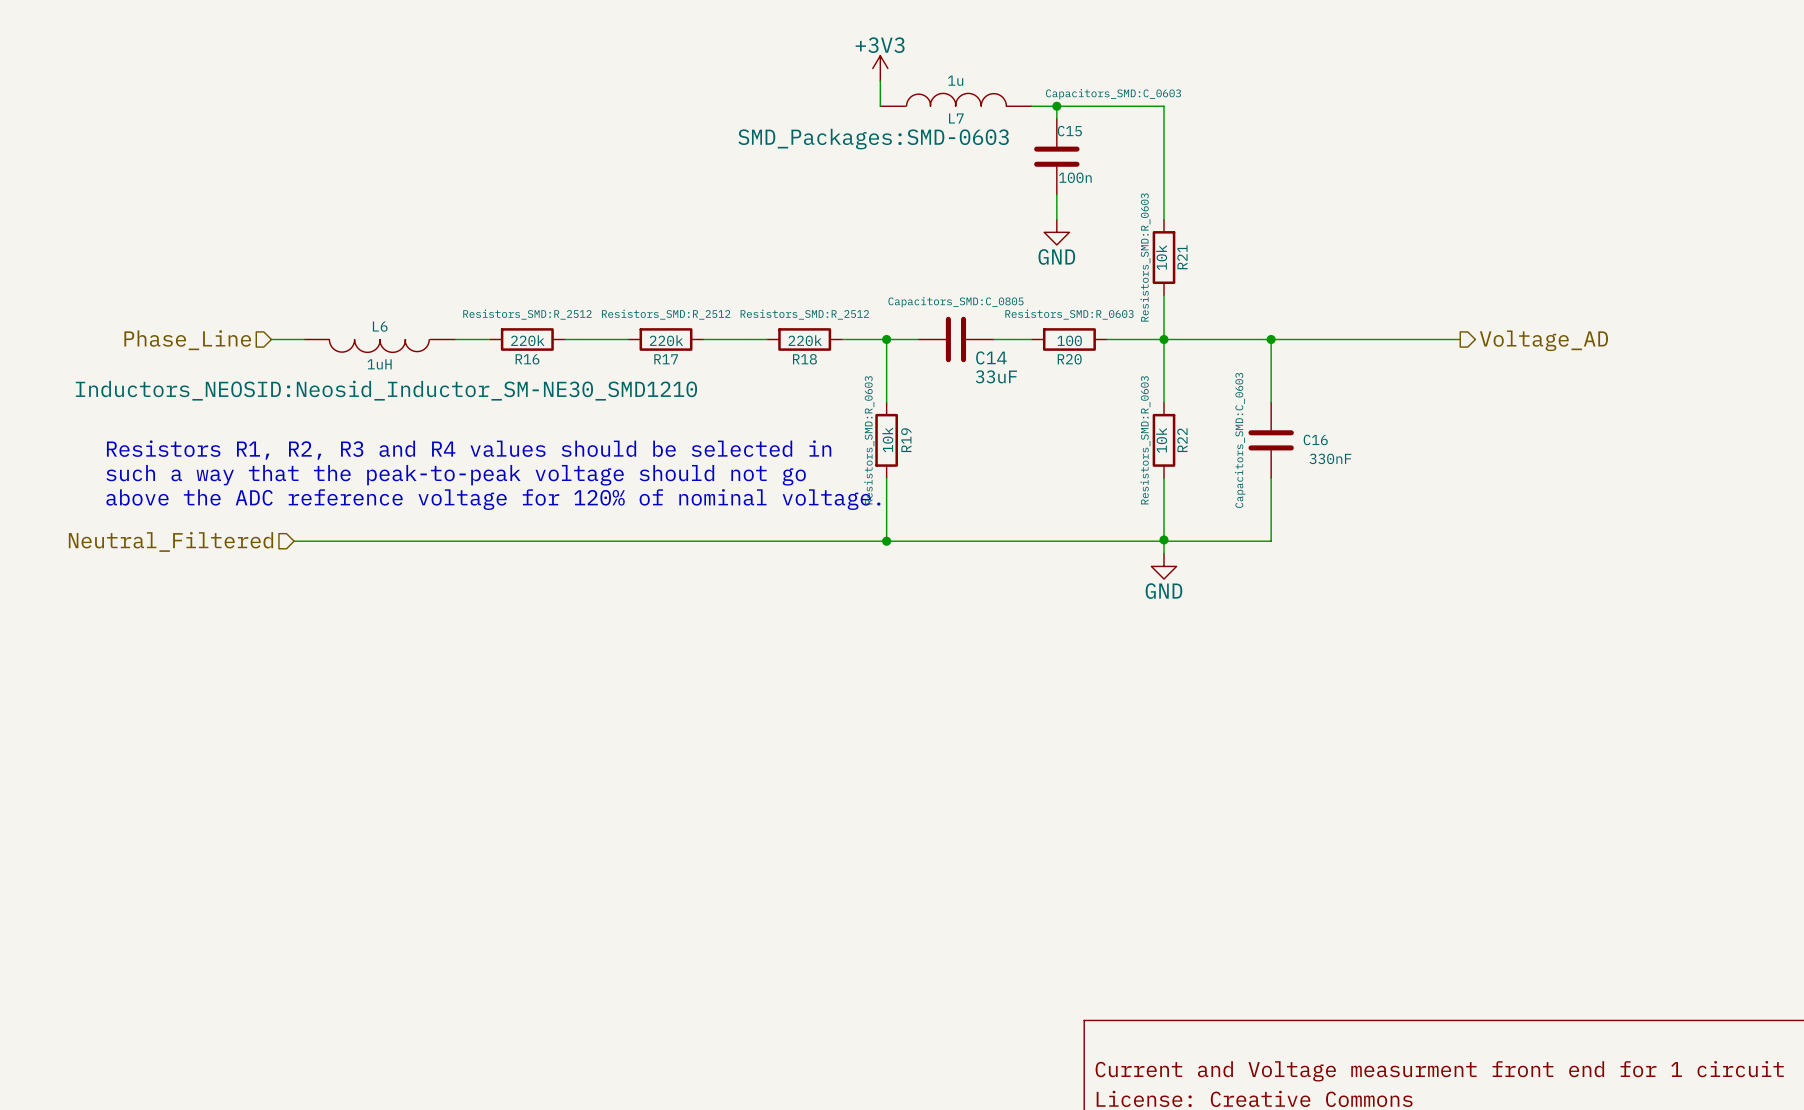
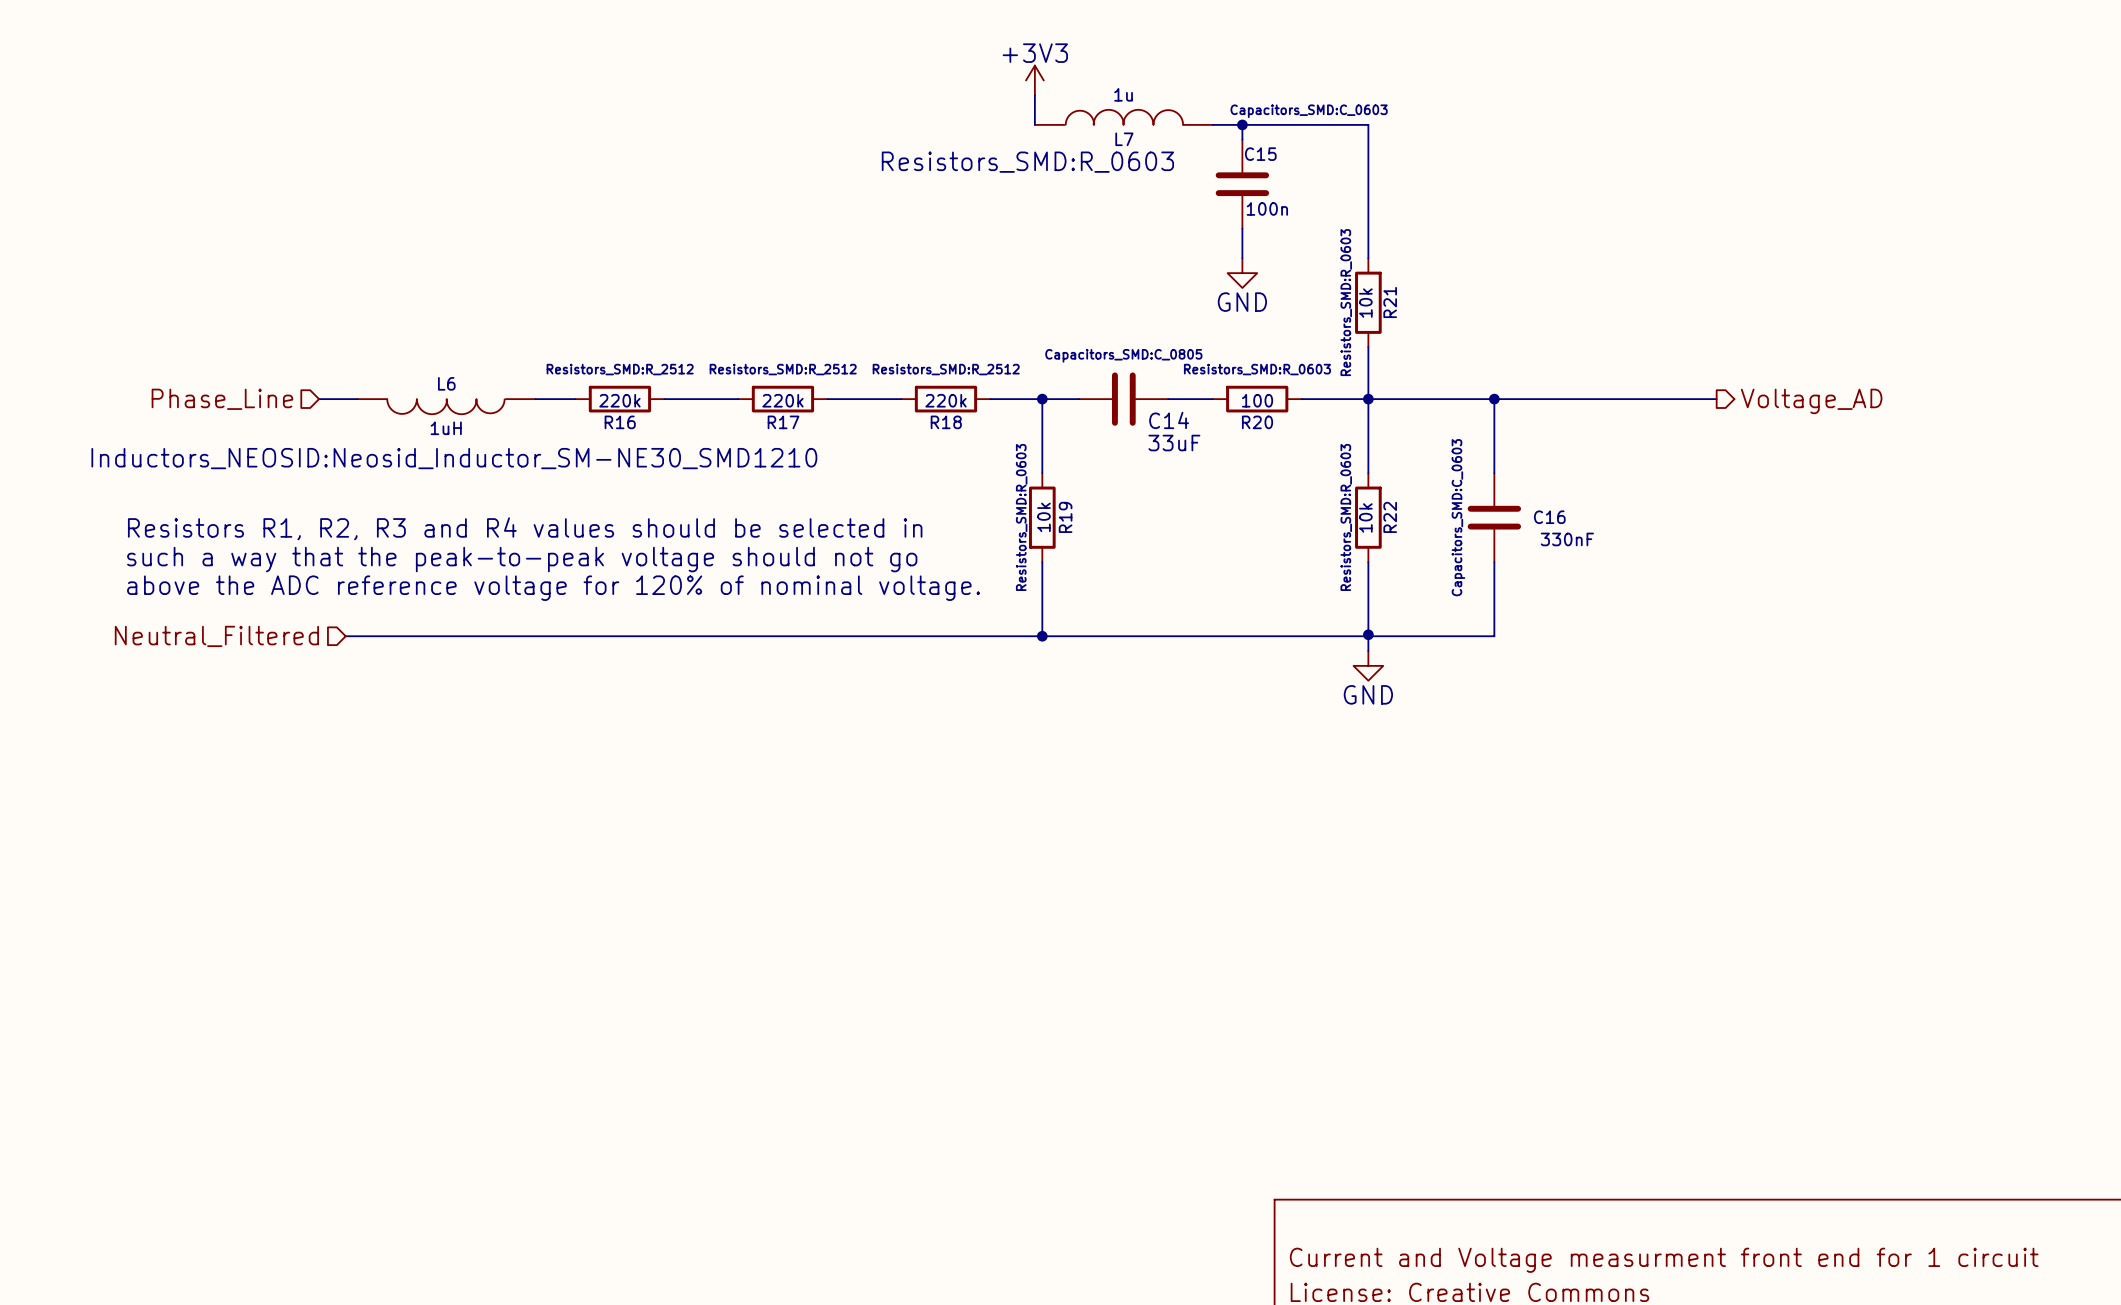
L7 text: SMD_Packages:SMD-0603 (873, 139) -> Resistors_SMD:R_0603 (1027, 162)

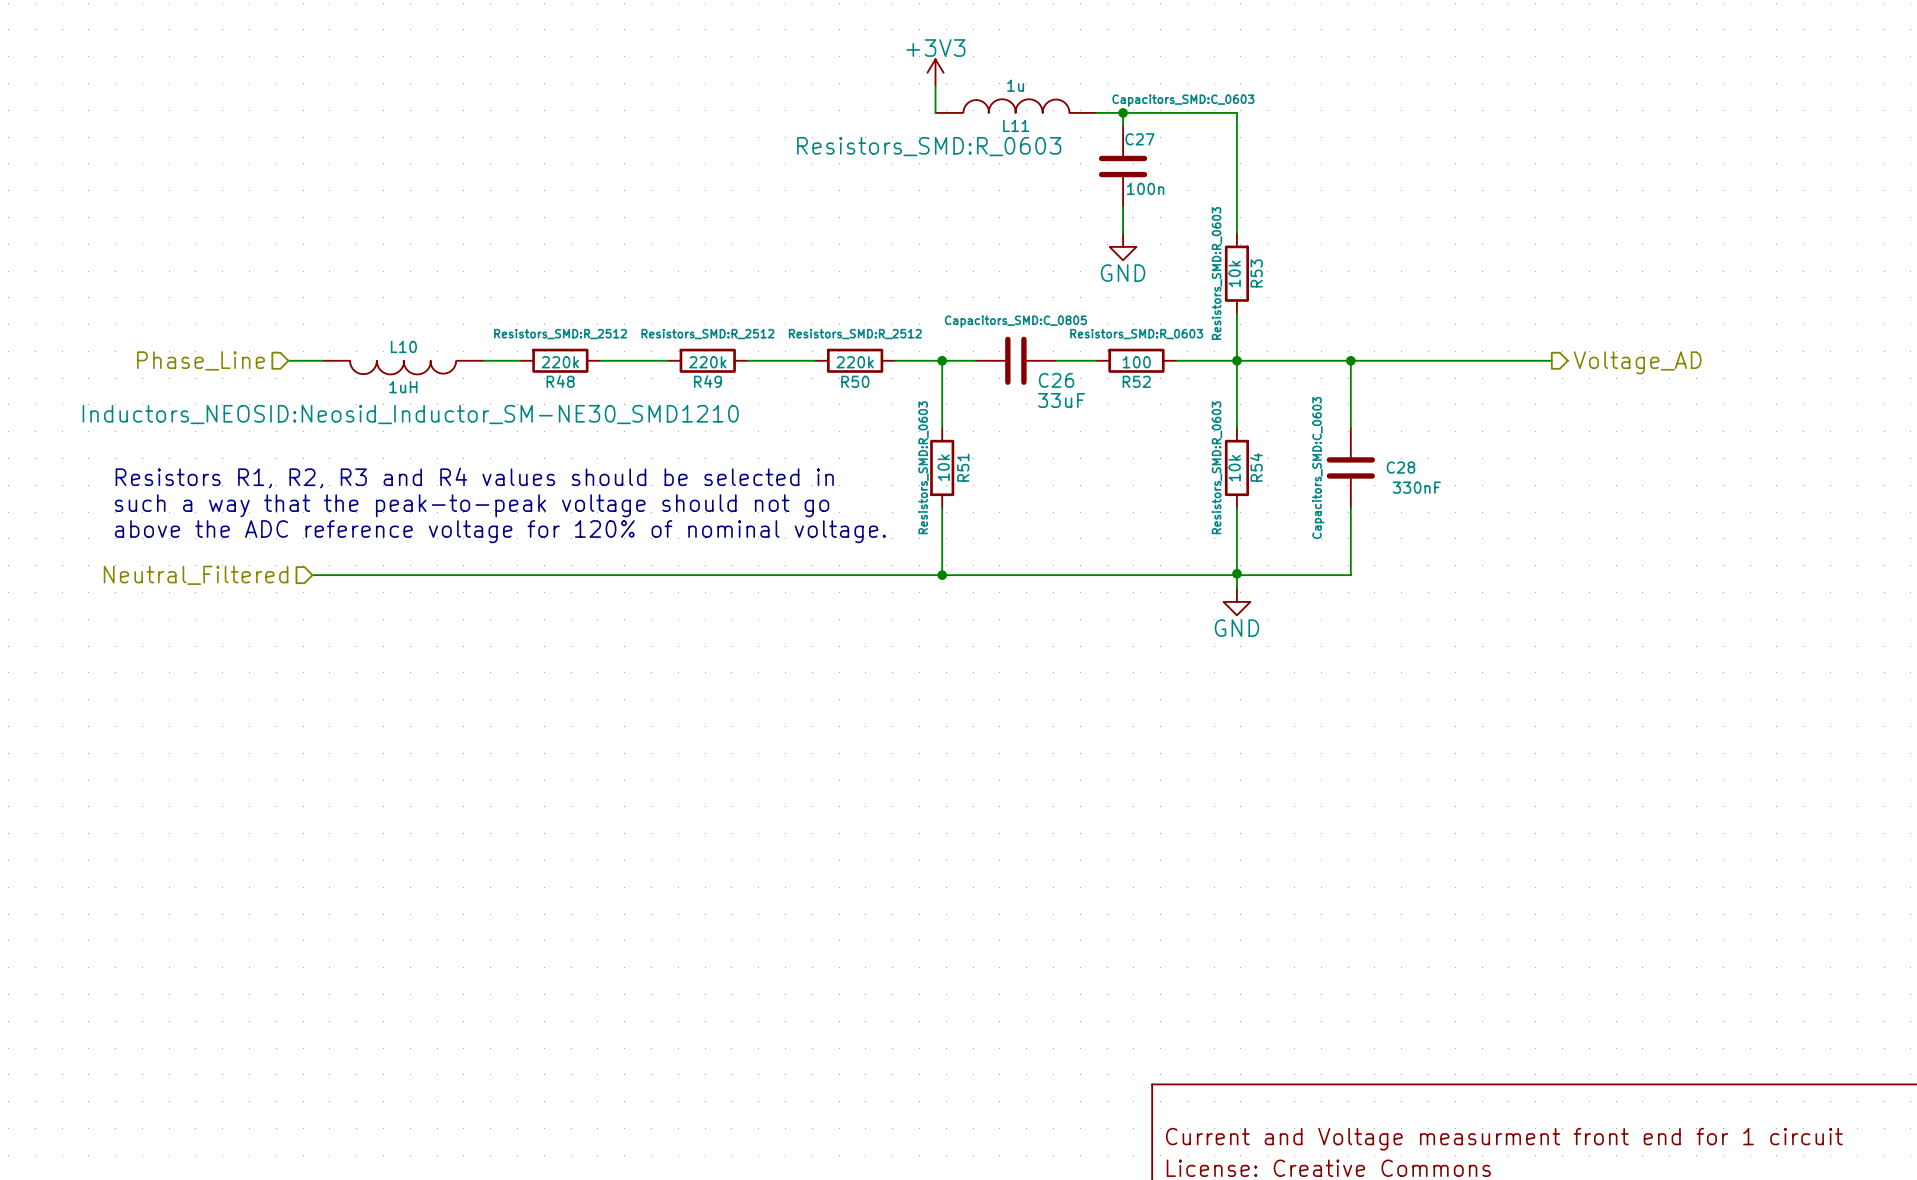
L7 name: L7 (1124, 139) -> L11 (1016, 125)
C15 name: C15 (1260, 154) -> C27 (1139, 139)
R21 name: R21 (1390, 302) -> R53 (1256, 273)
L6 name: L6 (446, 383) -> L10 (403, 346)
C14 name: C14 (1169, 420) -> C26 (1056, 380)
R16 name: R16 (620, 422) -> R48 (560, 381)
R17 name: R17 (783, 422) -> R49 (708, 381)
R18 name: R18 (946, 422) -> R50 (855, 381)
R20 name: R20 (1257, 422) -> R52 (1136, 381)
R19 name: R19 (1065, 517) -> R51 (963, 467)
R22 name: R22 (1390, 517) -> R54 (1256, 467)
C16 name: C16 (1549, 517) -> C28 (1400, 467)

